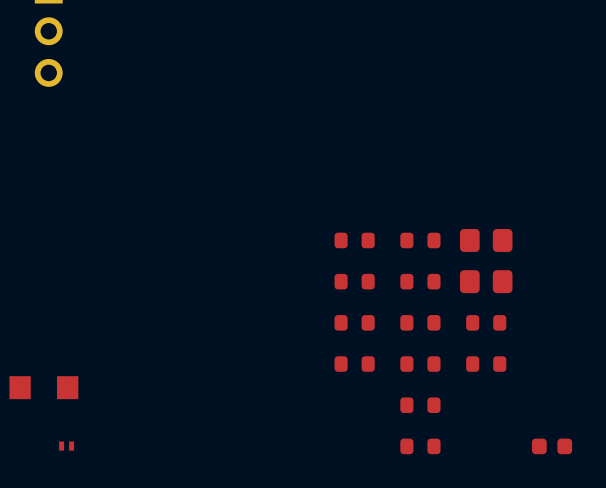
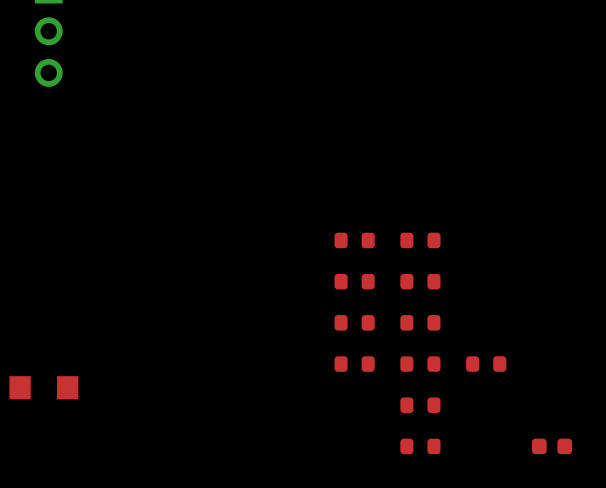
part: (486, 240) -> none
part: (486, 281) -> none
part: (486, 322) -> none
part: (66, 446) -> none

